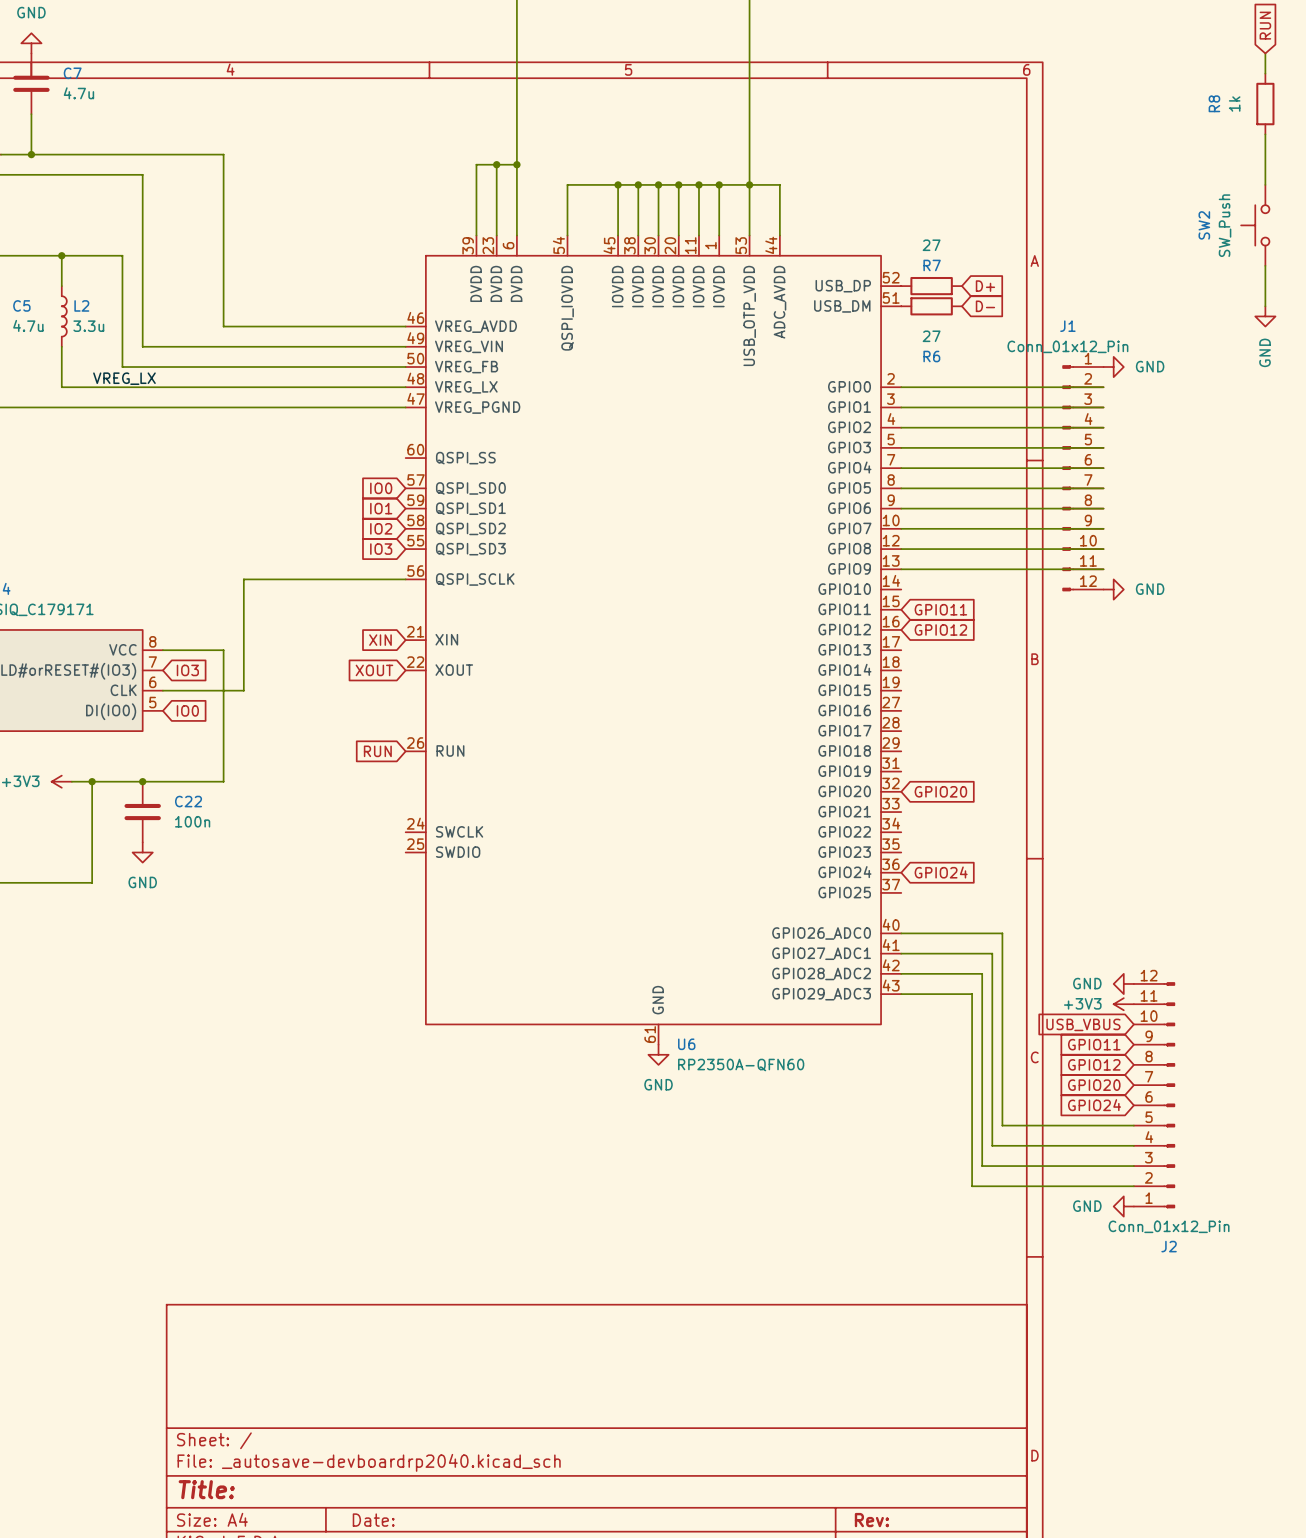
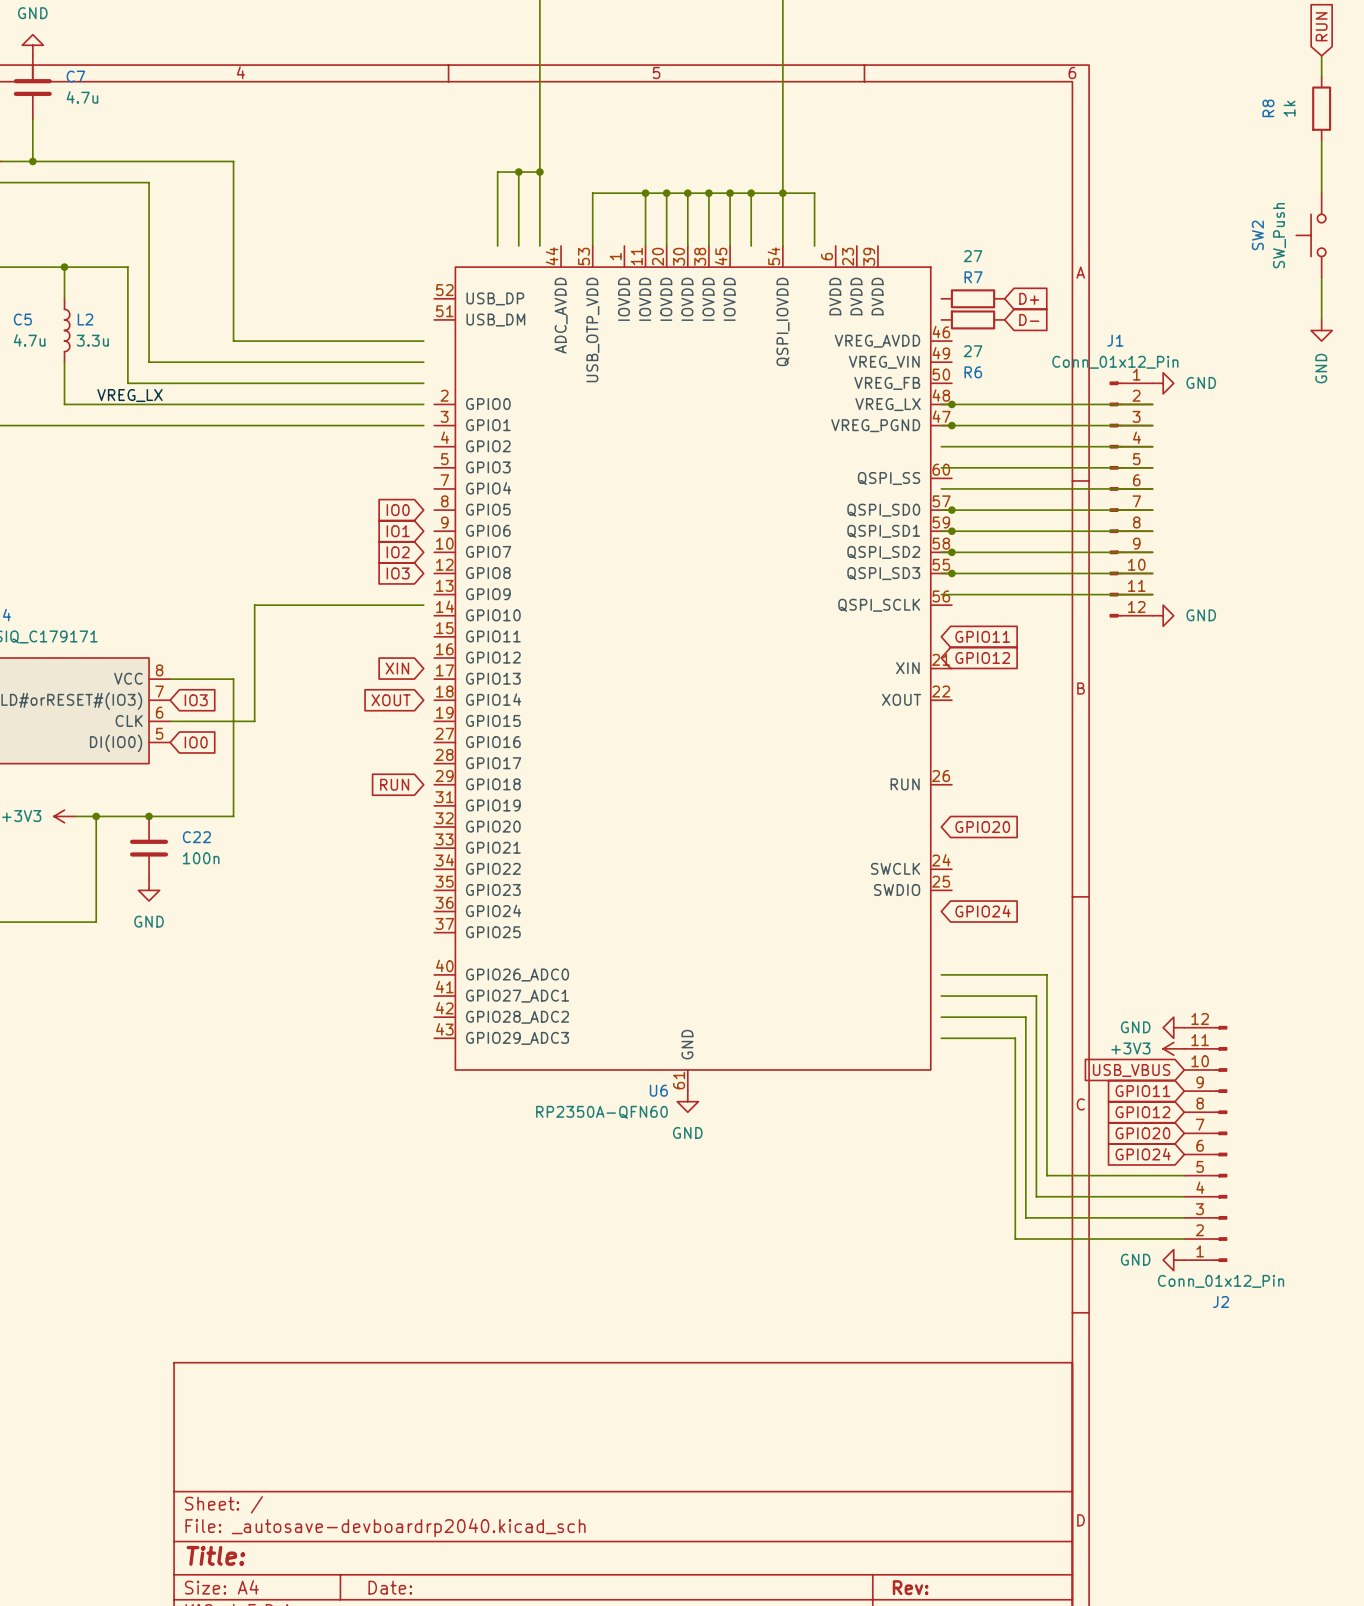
junction: none -> (951, 404)
junction: none -> (951, 425)
junction: none -> (951, 510)
junction: none -> (951, 531)
junction: none -> (951, 552)
junction: none -> (951, 573)
U6 flip: as is (653, 640) -> left-right (693, 668)

